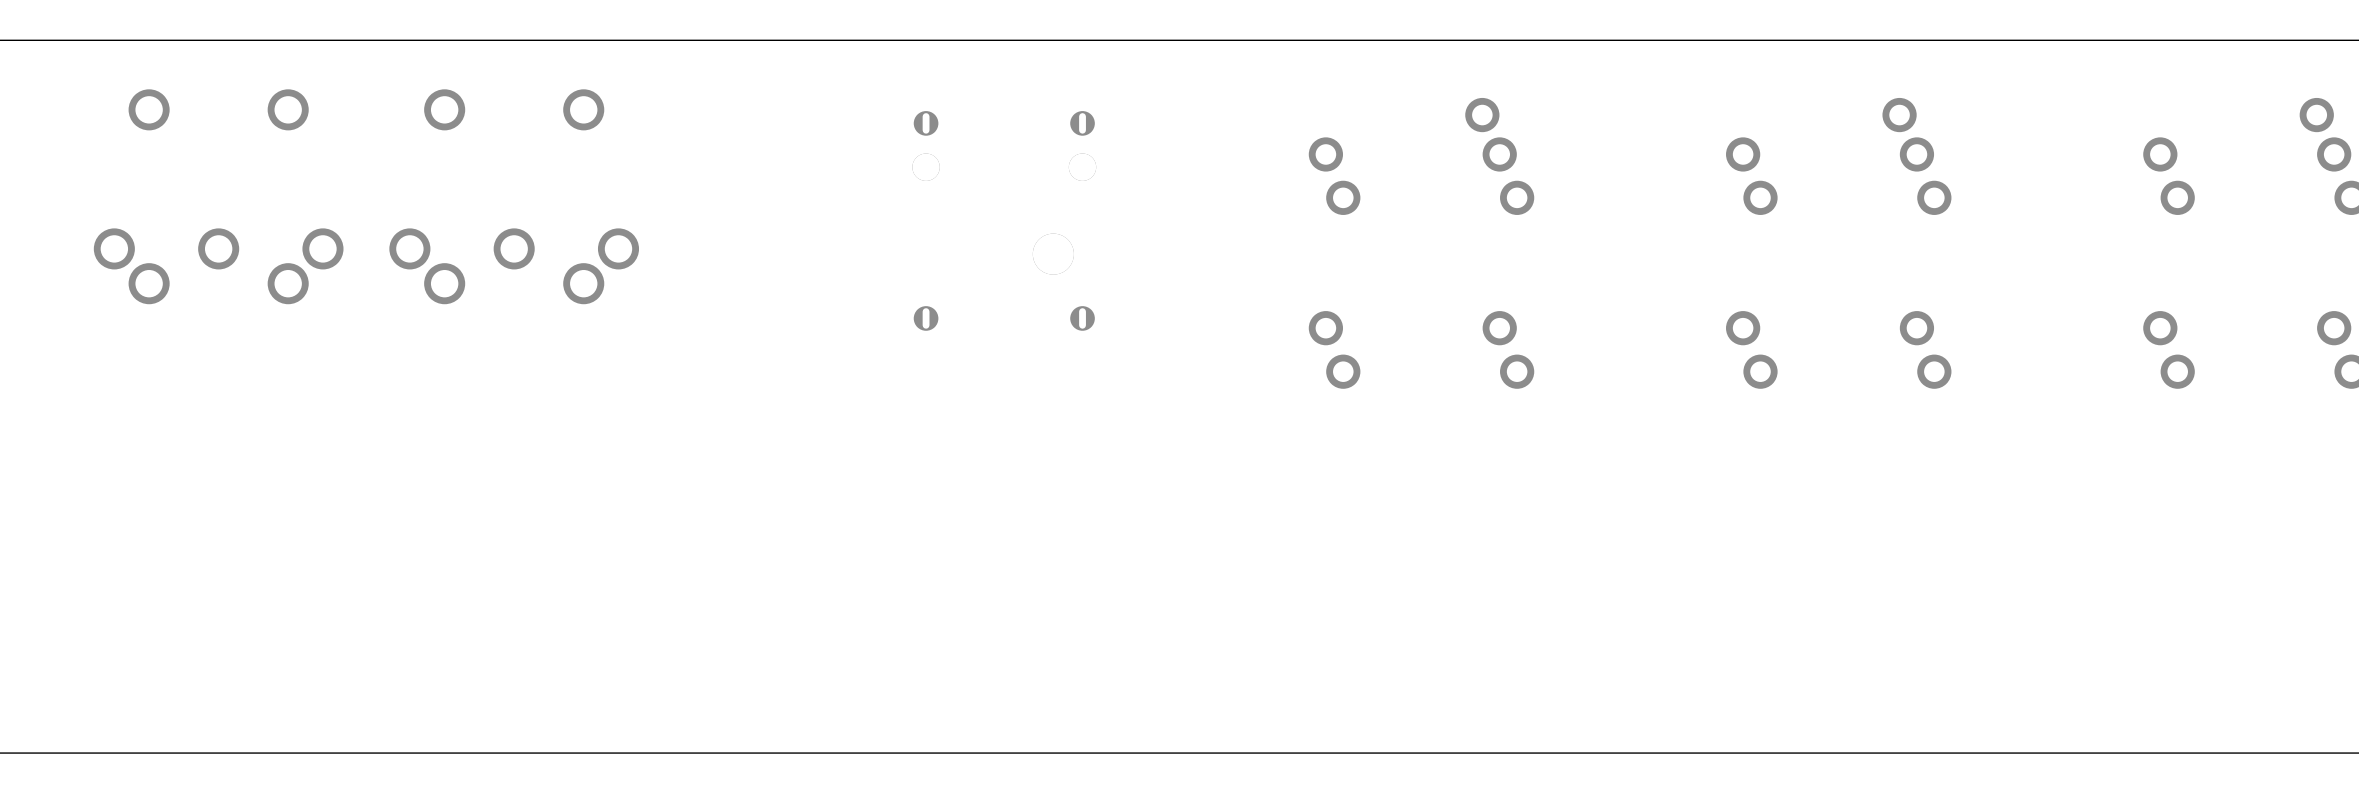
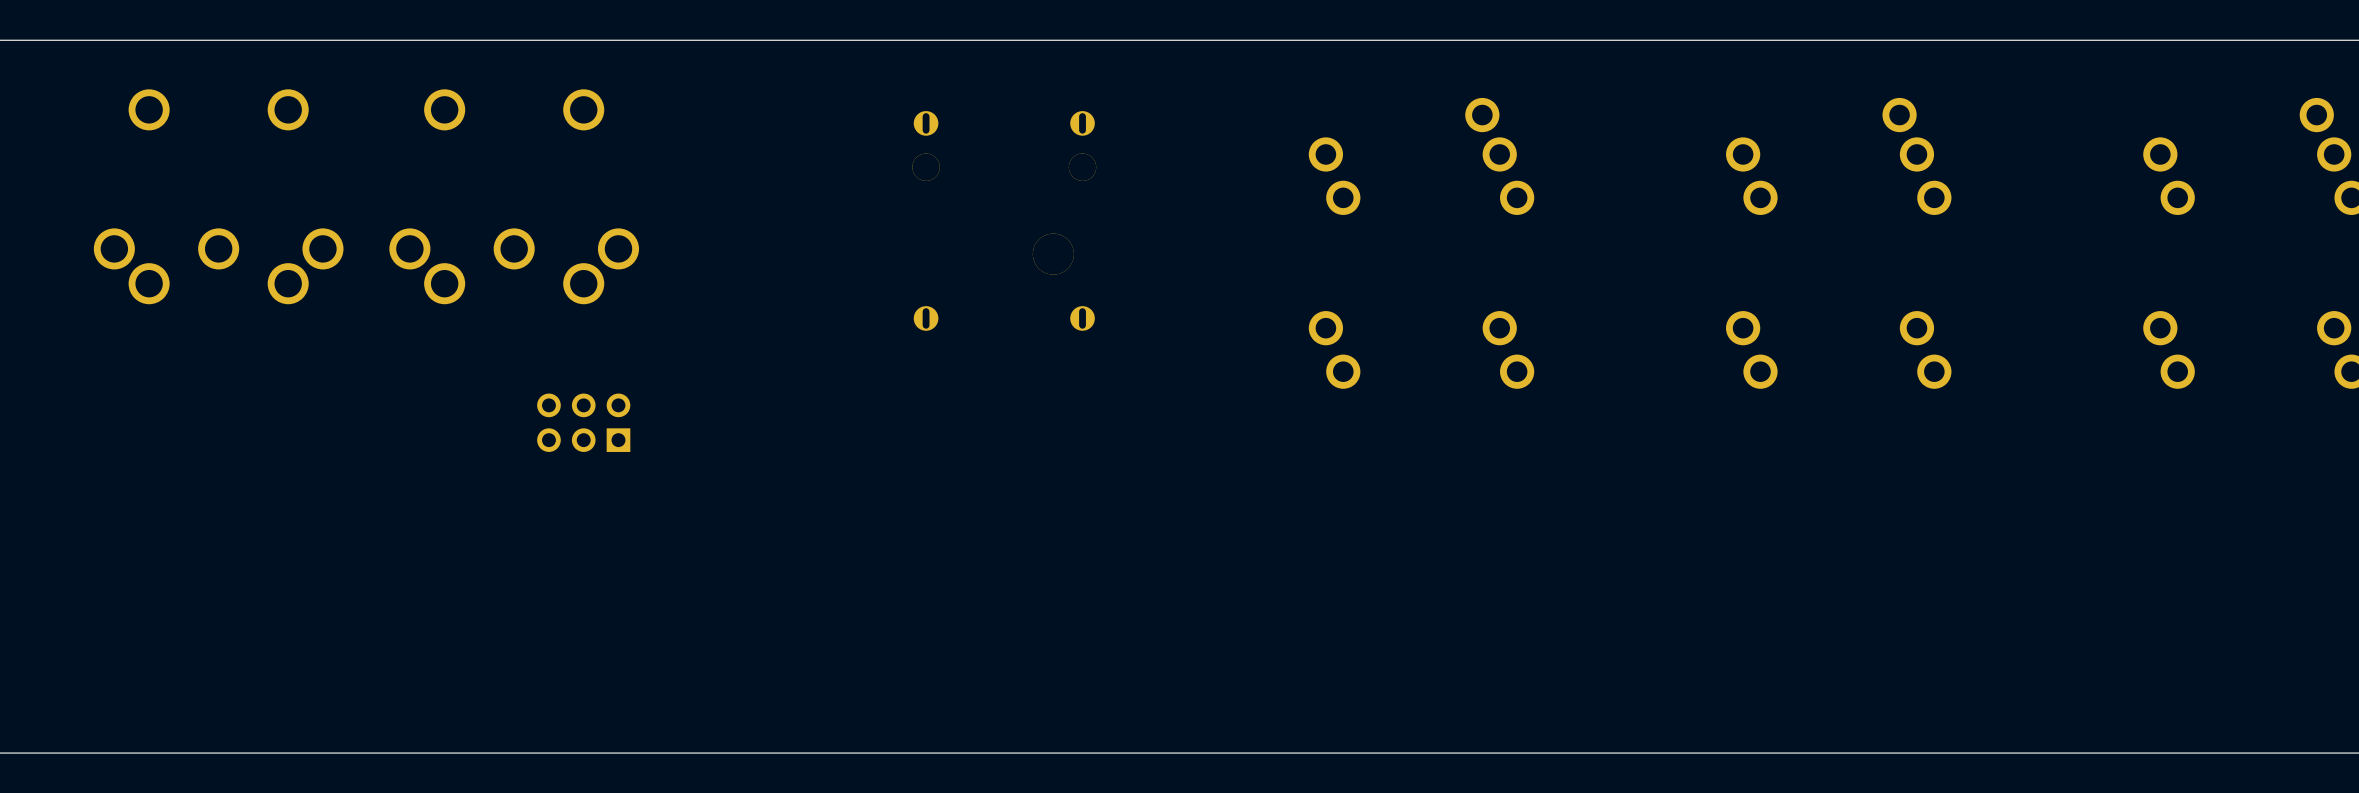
part: none -> (583, 422)

